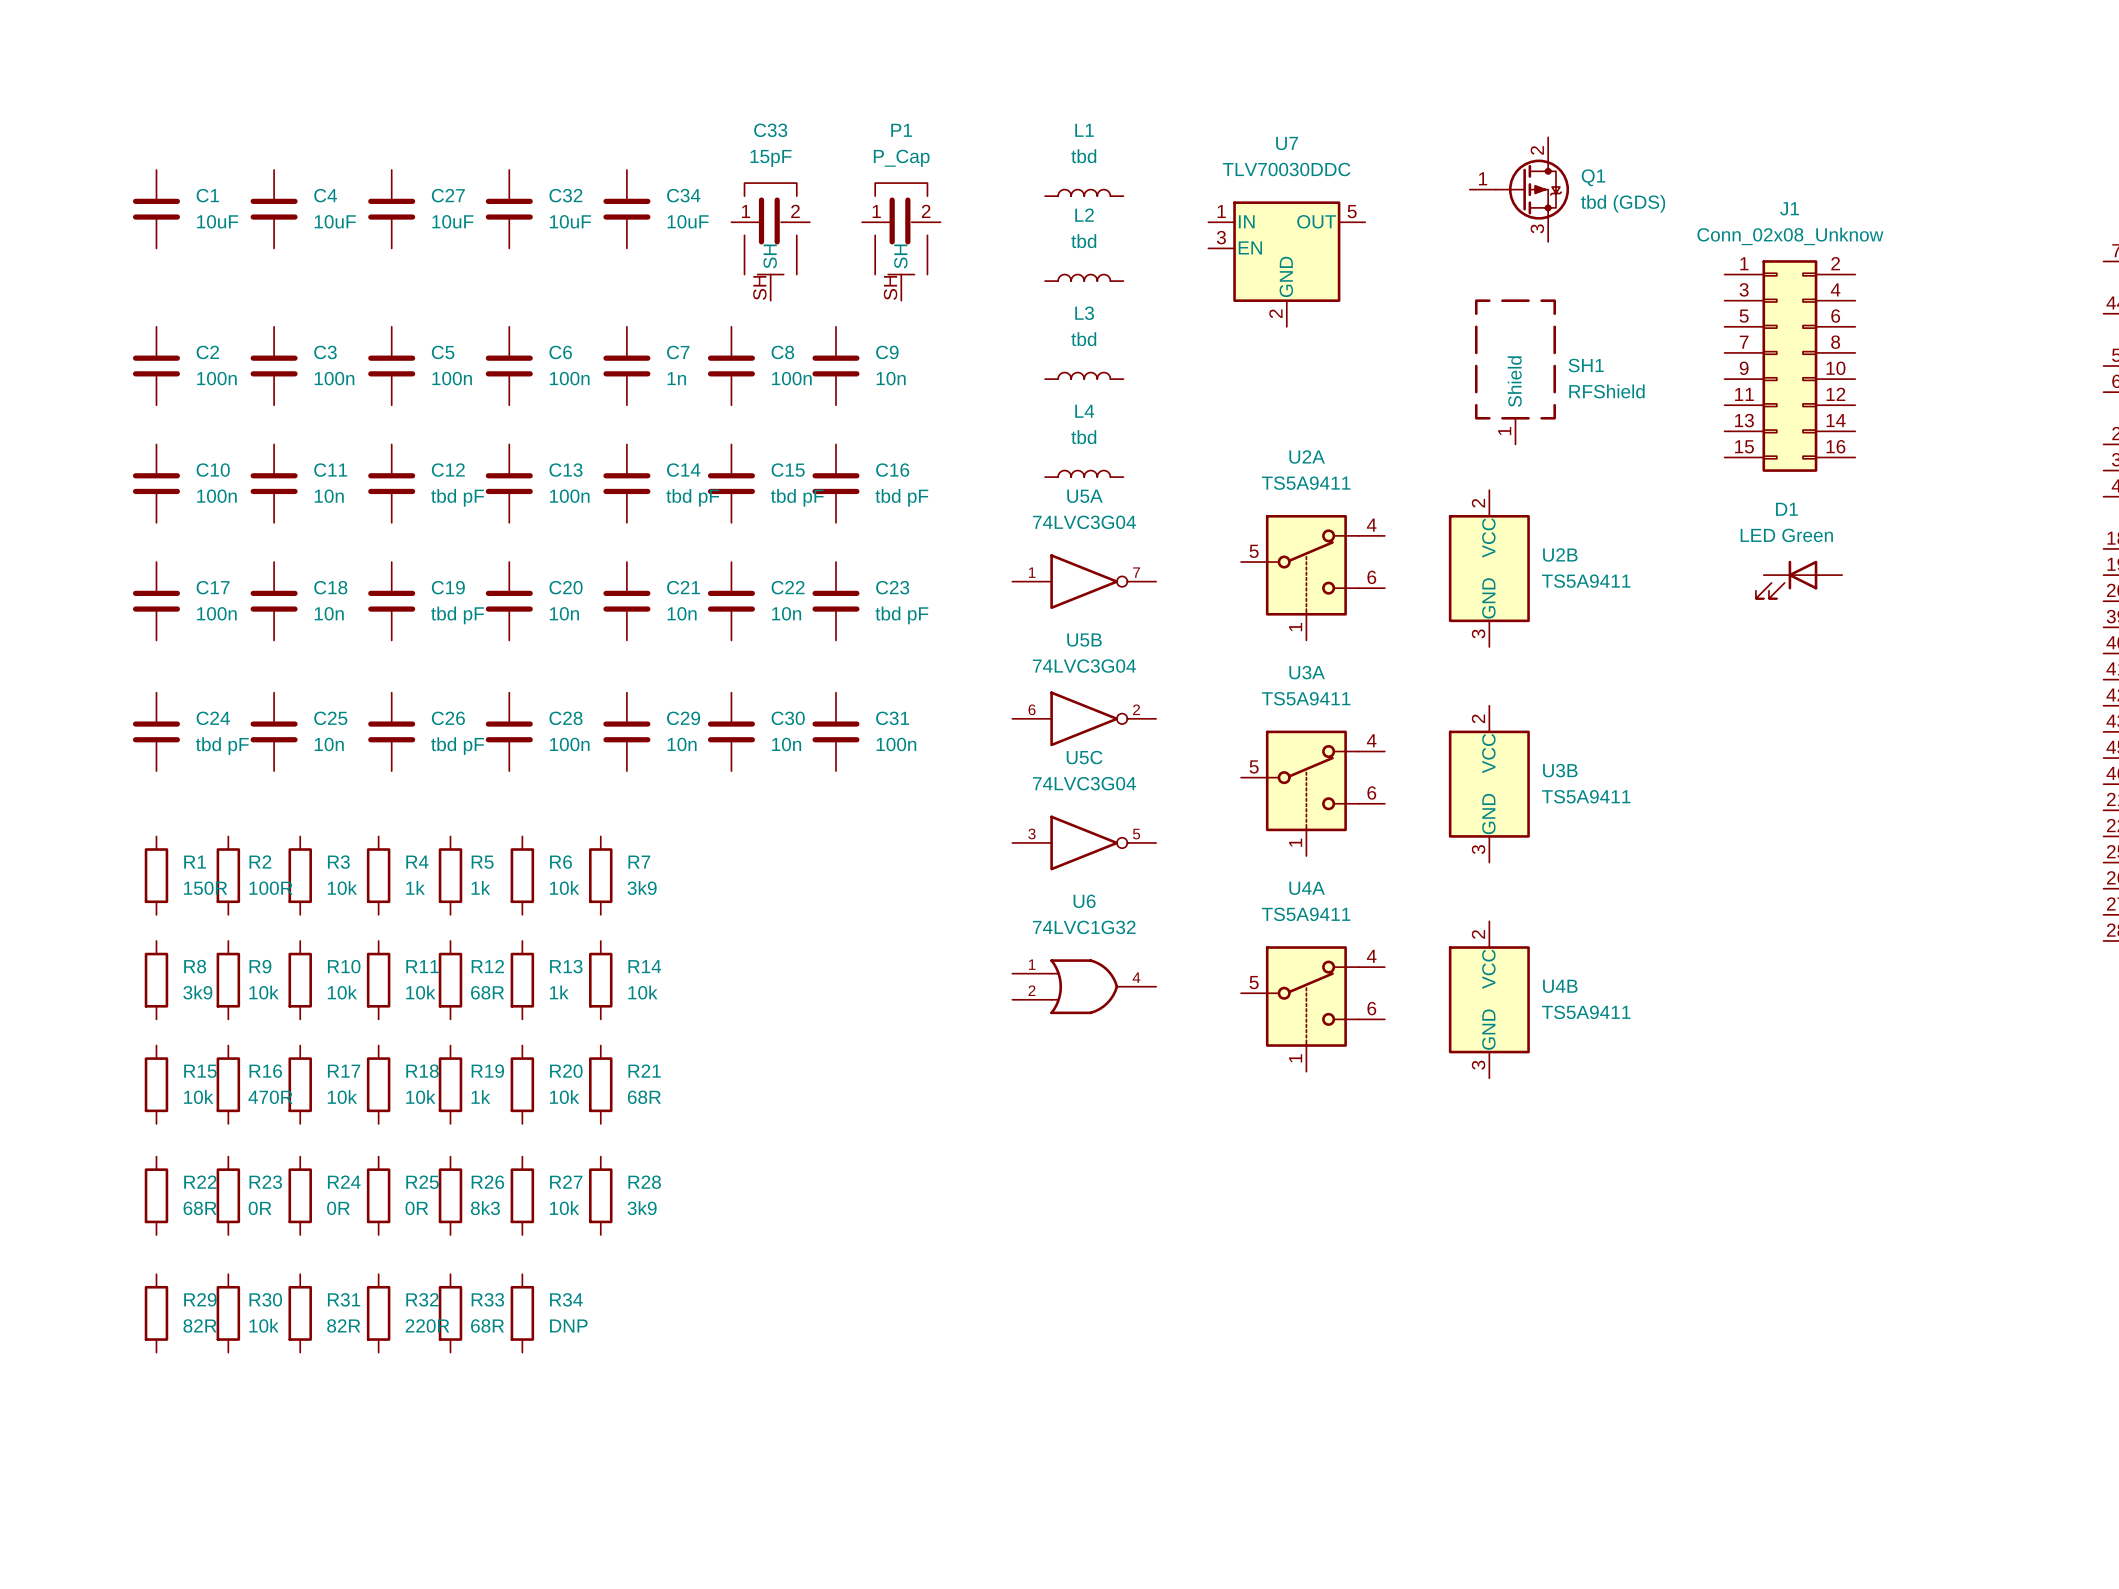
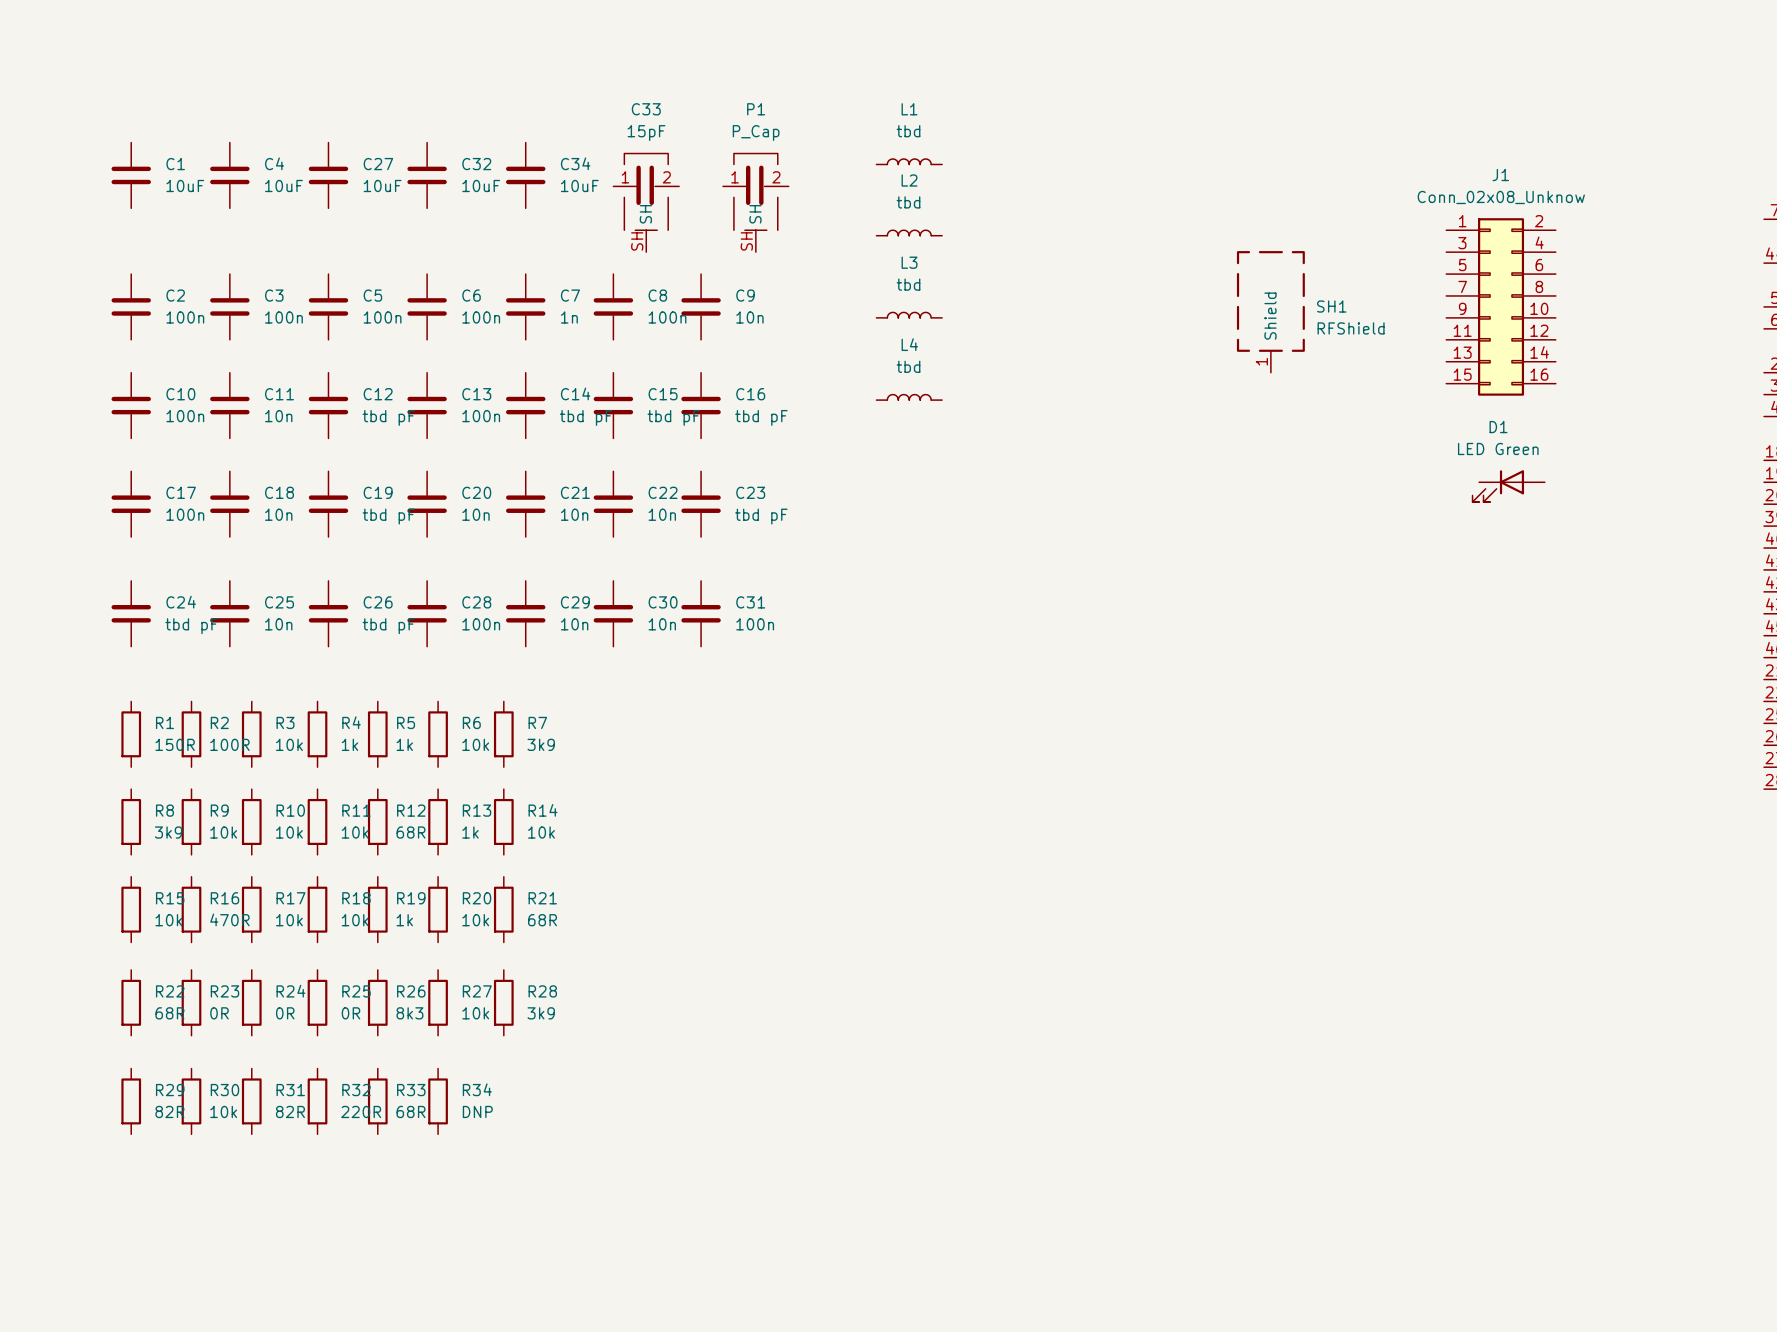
Q1: tbd (GDS) (1519, 189) -> none
U7: TLV70030DDC (1286, 264) -> none
U2B: TS5A9411 (1489, 568) -> none
U2A: TS5A9411 (1312, 577) -> none
U5A: 74LVC3G04 (1084, 581) -> none
U5B: 74LVC3G04 (1084, 718) -> none
U3B: TS5A9411 (1489, 784) -> none
U3A: TS5A9411 (1312, 793) -> none
U5C: 74LVC3G04 (1084, 842) -> none
U6: 74LVC1G32 (1084, 986) -> none
U4B: TS5A9411 (1489, 999) -> none
U4A: TS5A9411 (1312, 1008) -> none

